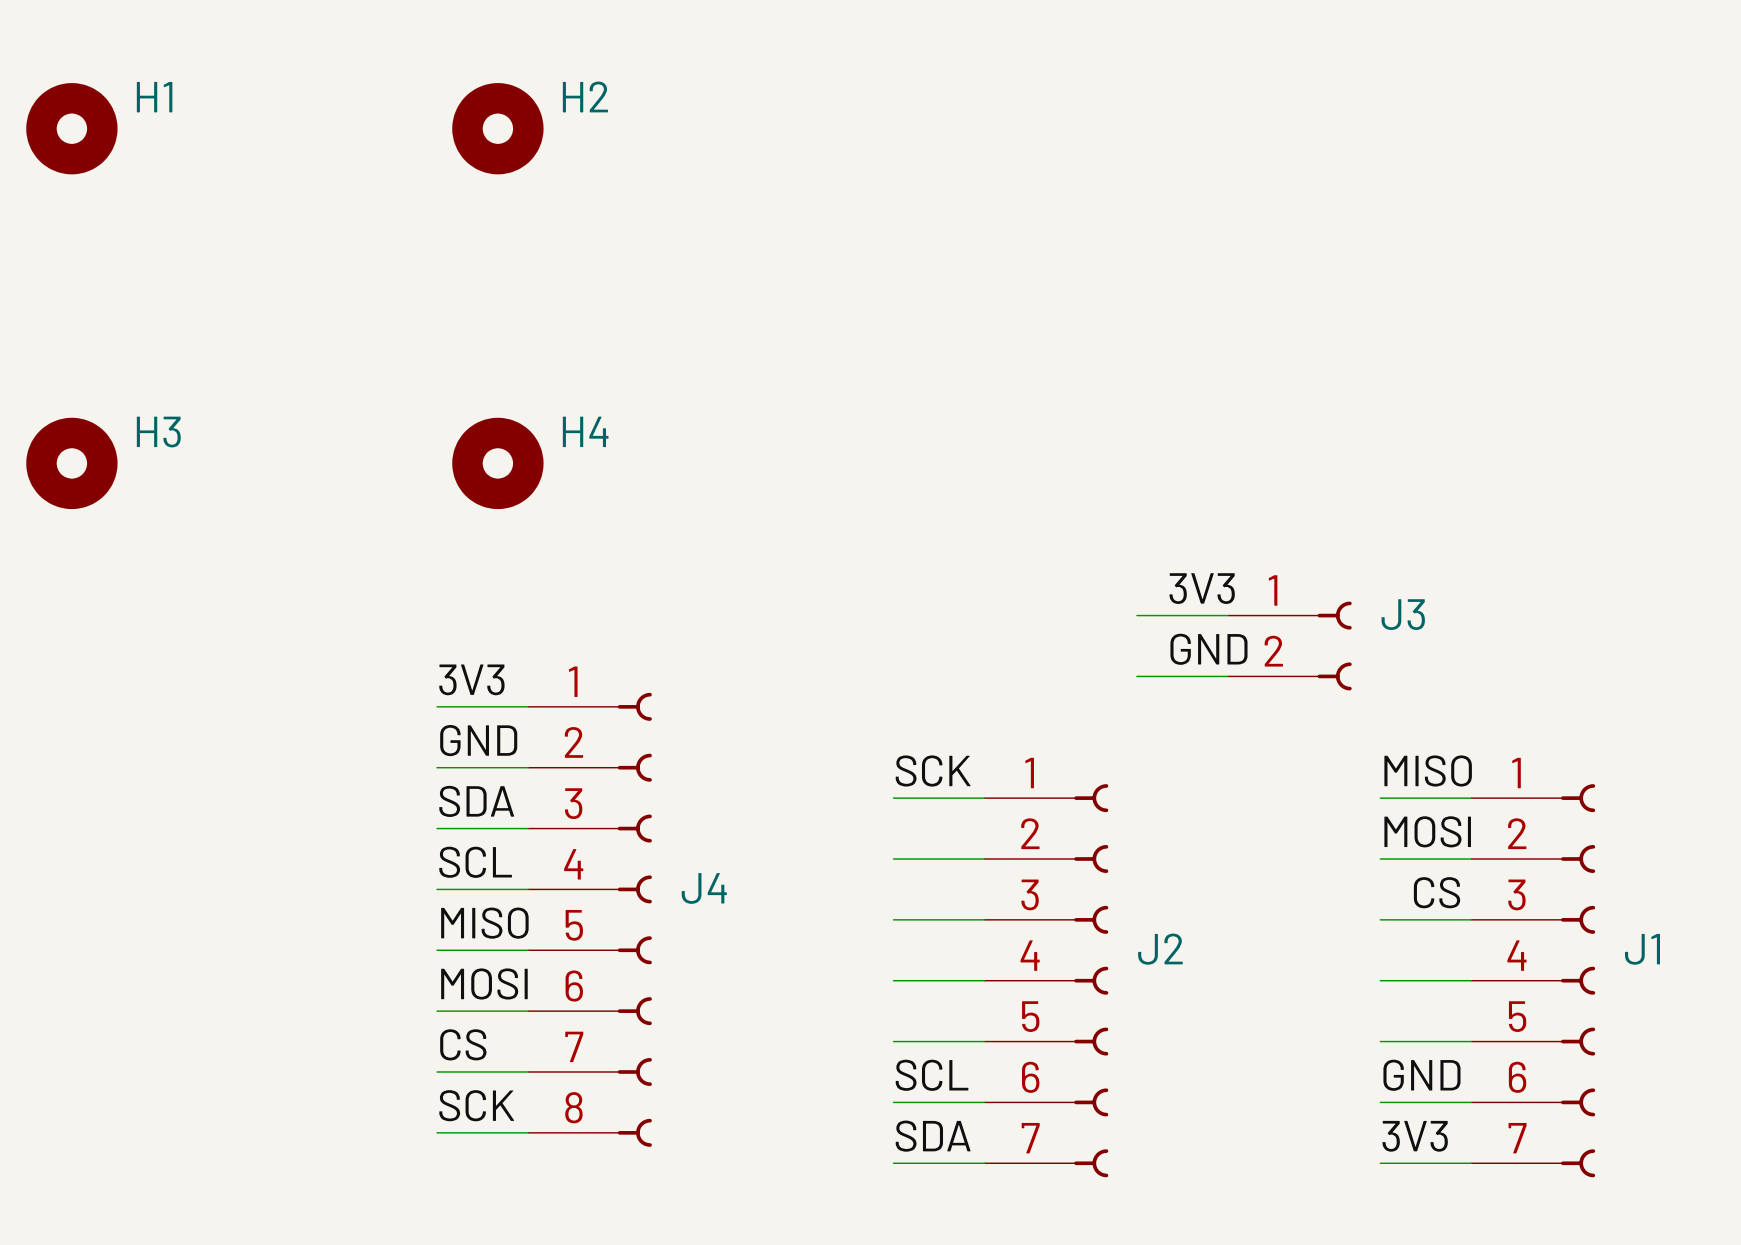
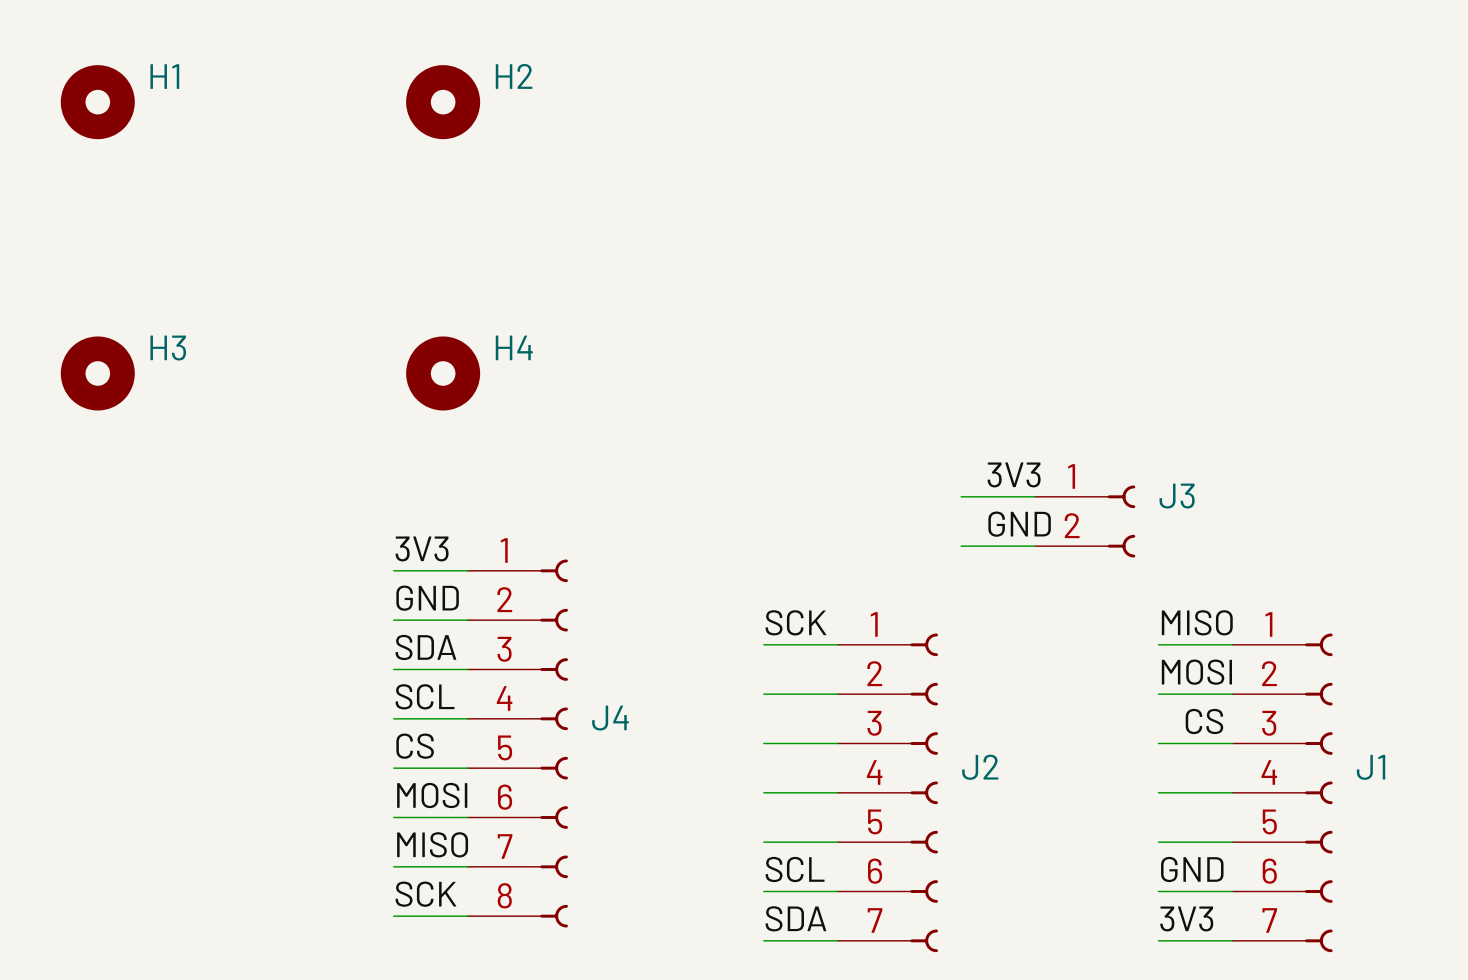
label: MISO (484, 923) -> CS (415, 746)
label: CS (463, 1044) -> MISO (432, 844)

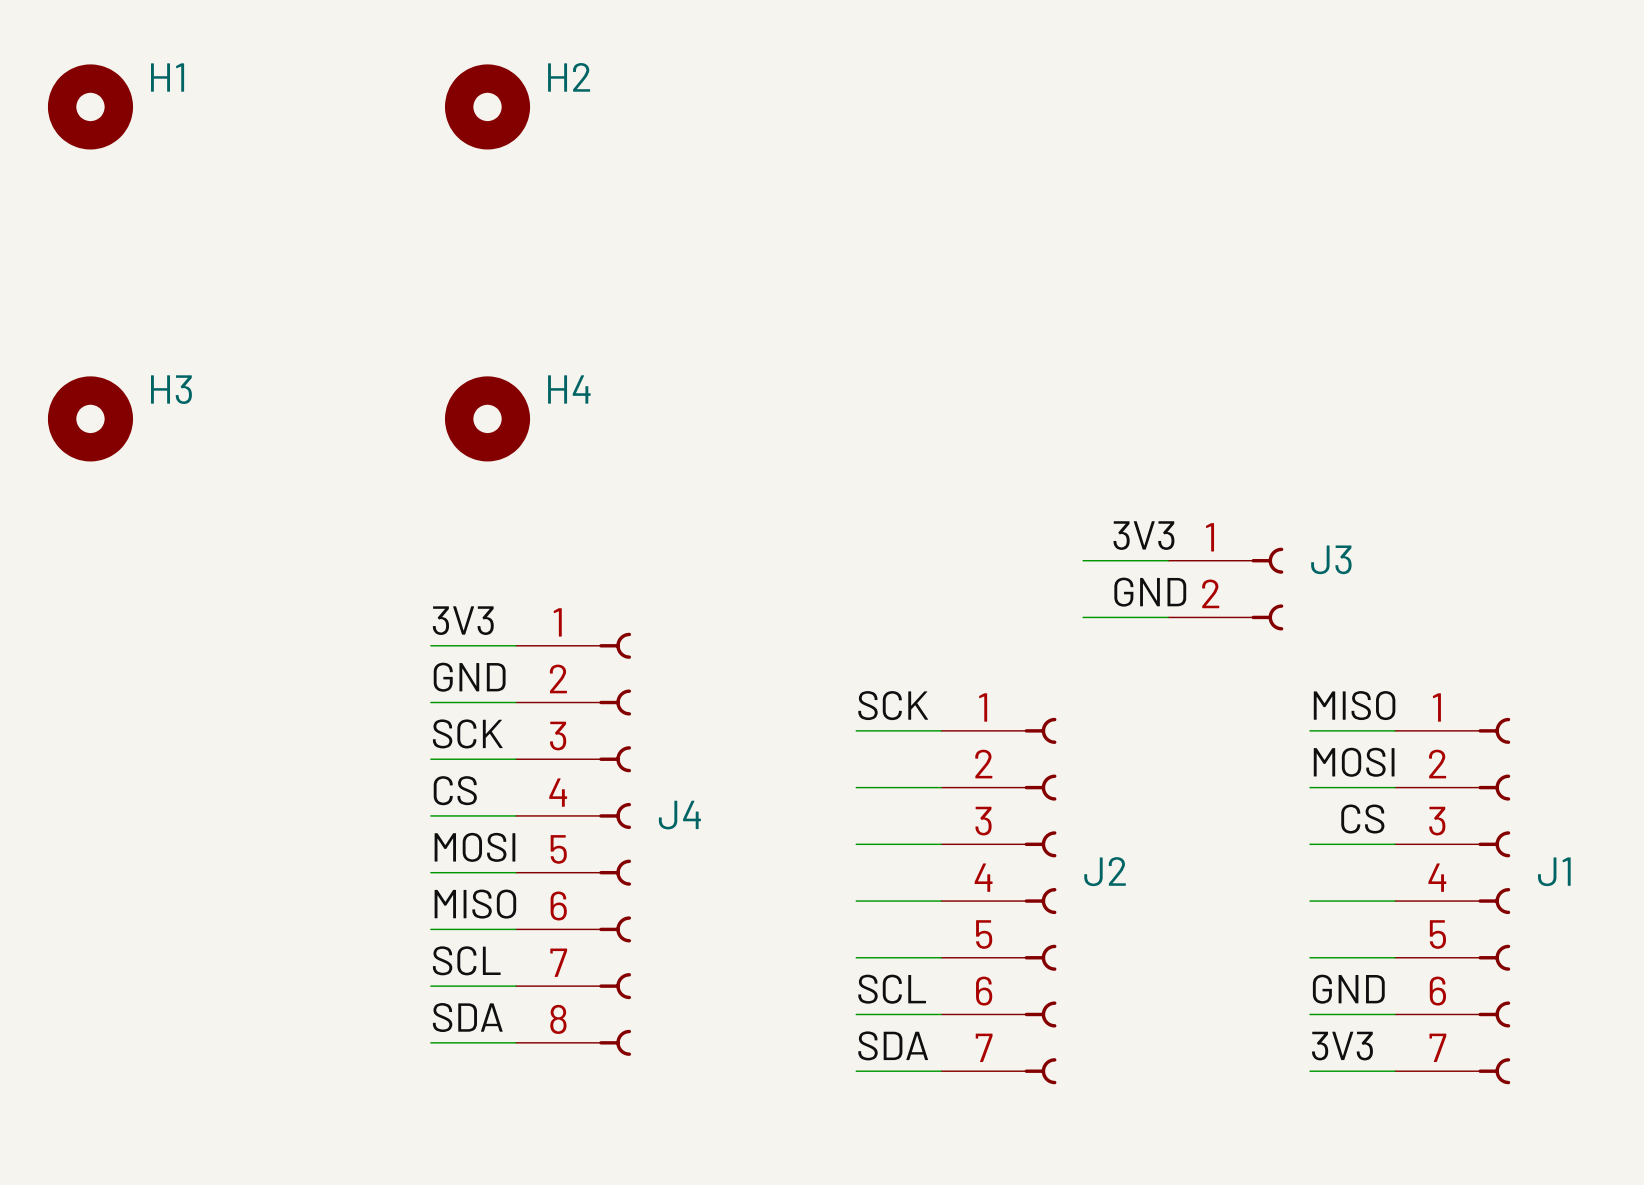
label: SDA (425, 647) -> SCK (467, 733)
label: SCL (425, 696) -> CS (455, 790)
label: CS (415, 746) -> MOSI (474, 847)
label: MOSI (432, 795) -> MISO (475, 904)
label: MISO (432, 844) -> SCL (466, 960)
label: SCK (426, 894) -> SDA (467, 1017)

